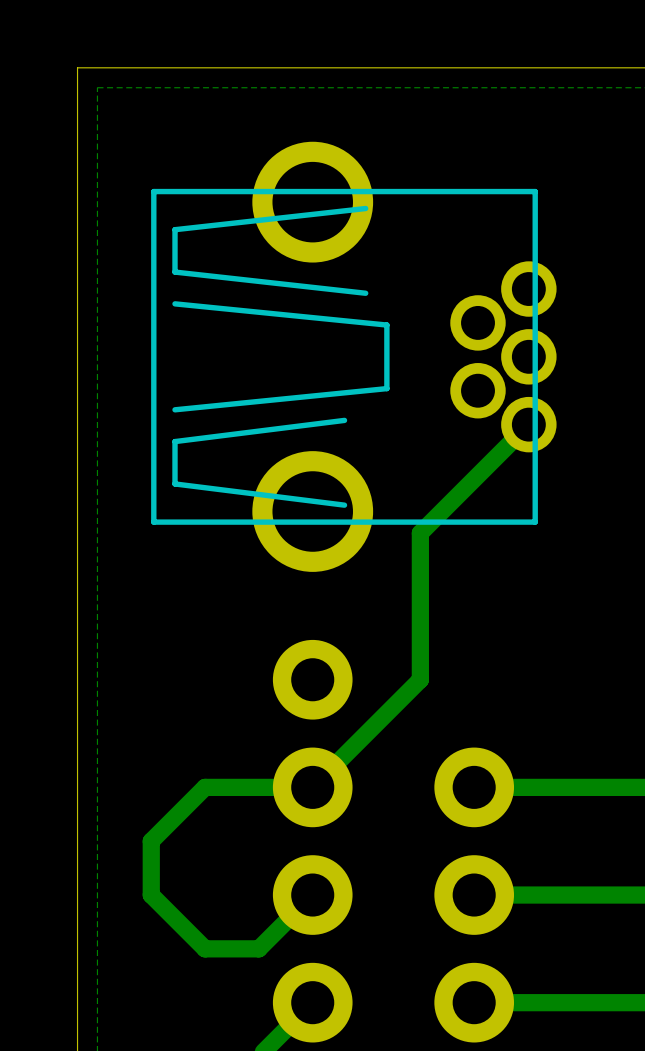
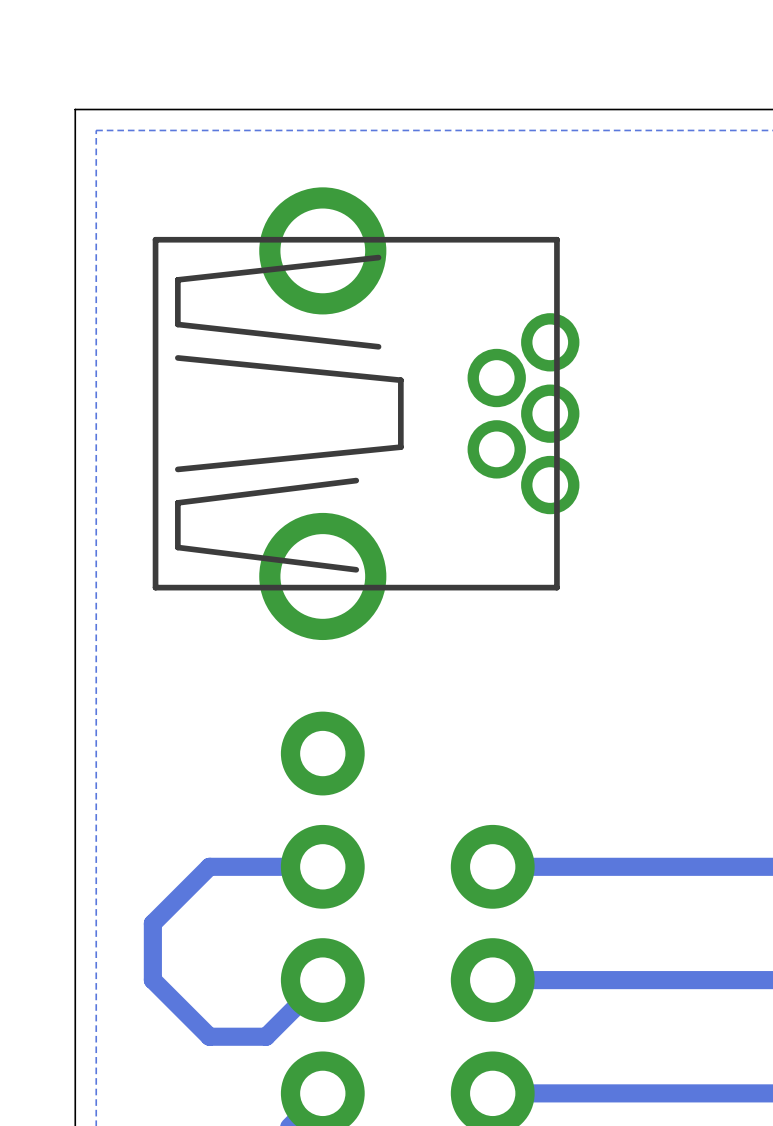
bottom track: (528, 424) (420, 533) (420, 679) (312, 787) -> none

